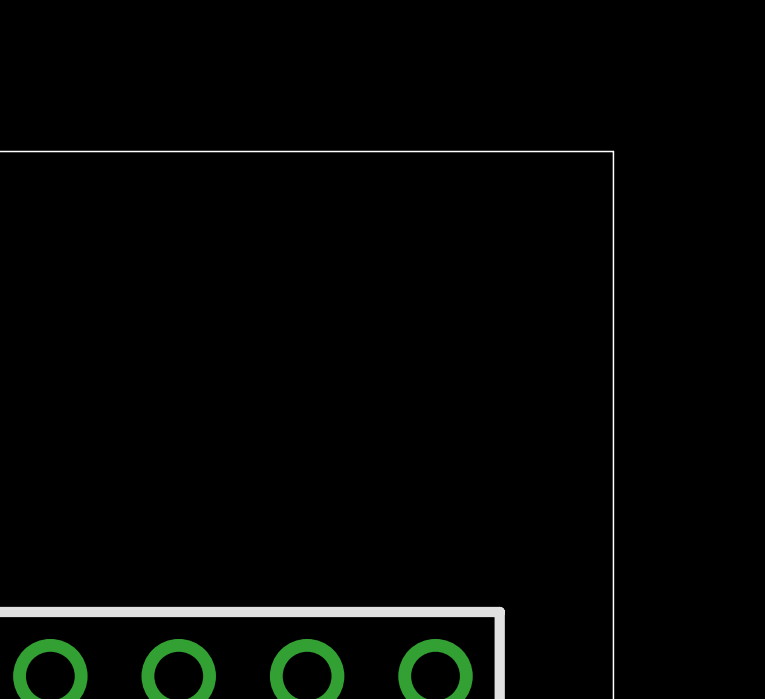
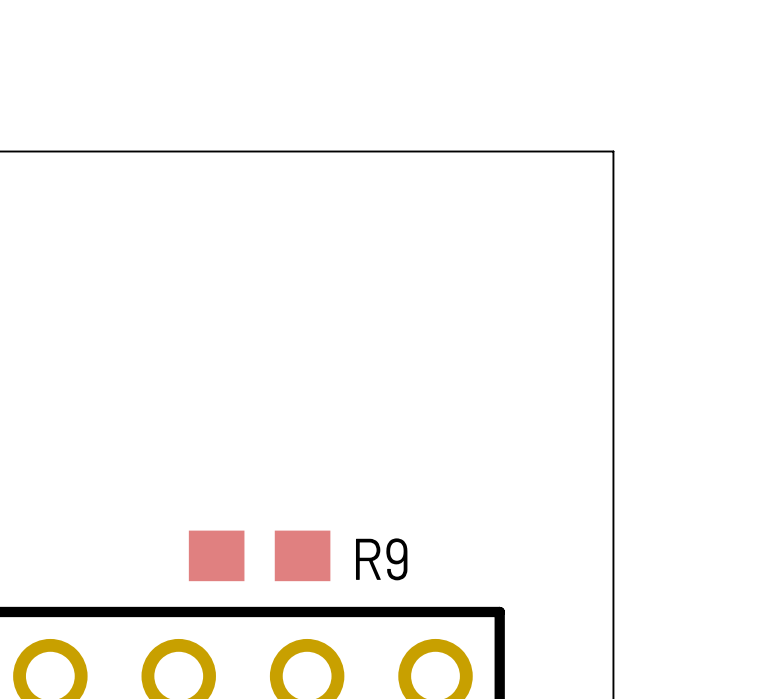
R9: none -> (259, 555)

